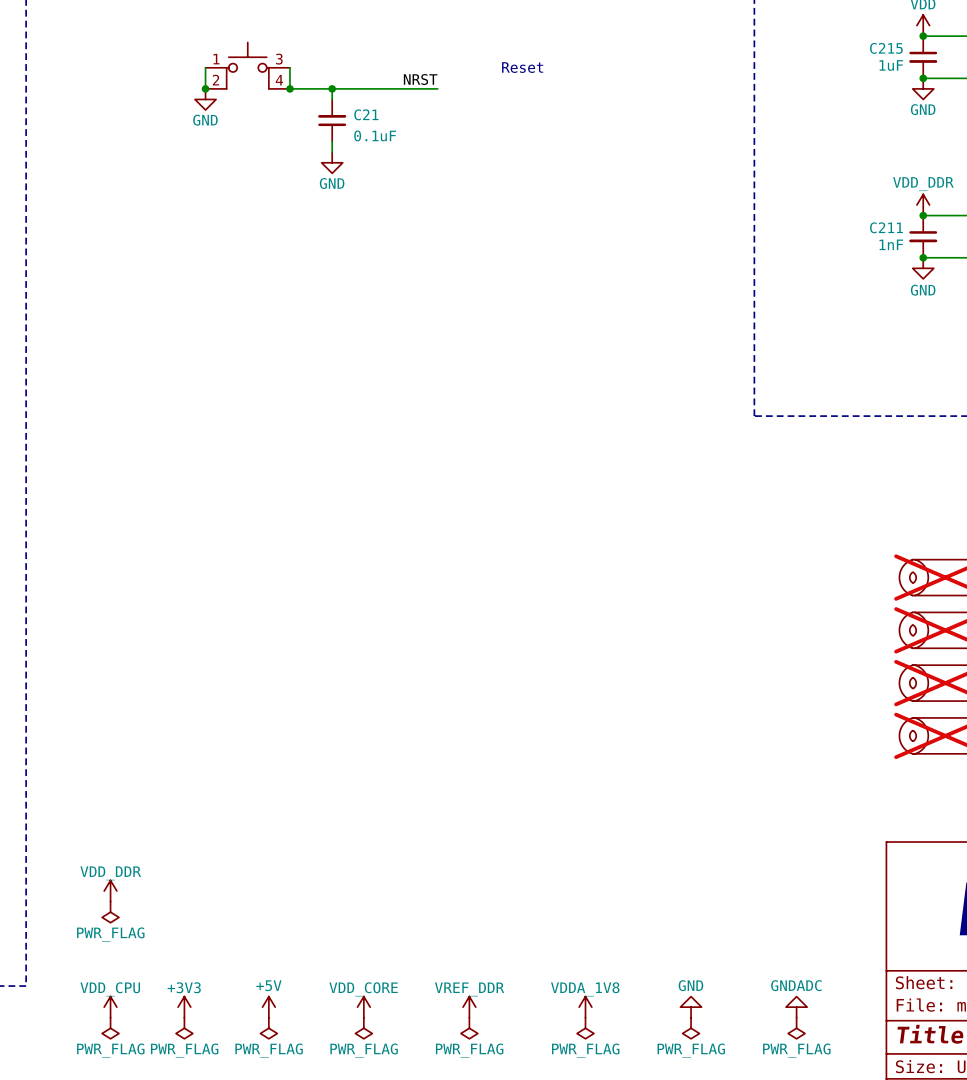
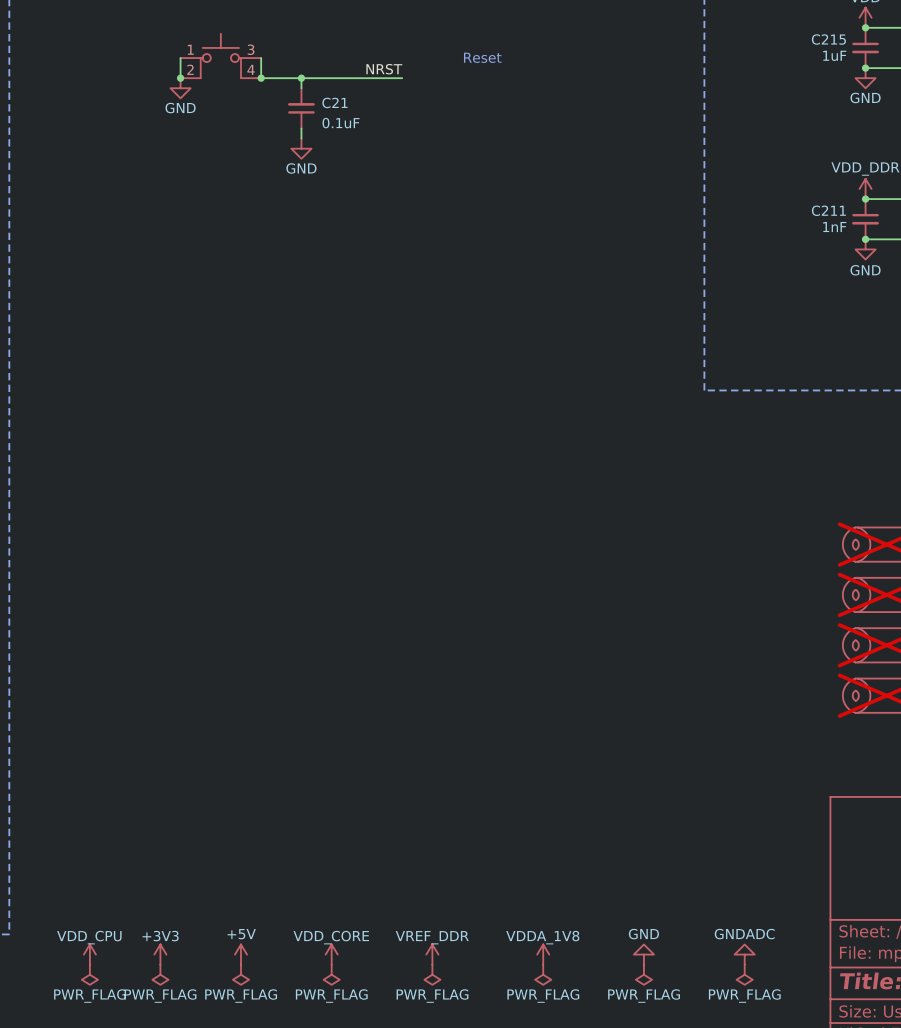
power symbol: VDD_DDR (110, 891) -> none
power symbol: PWR_FLAG (110, 912) -> none

